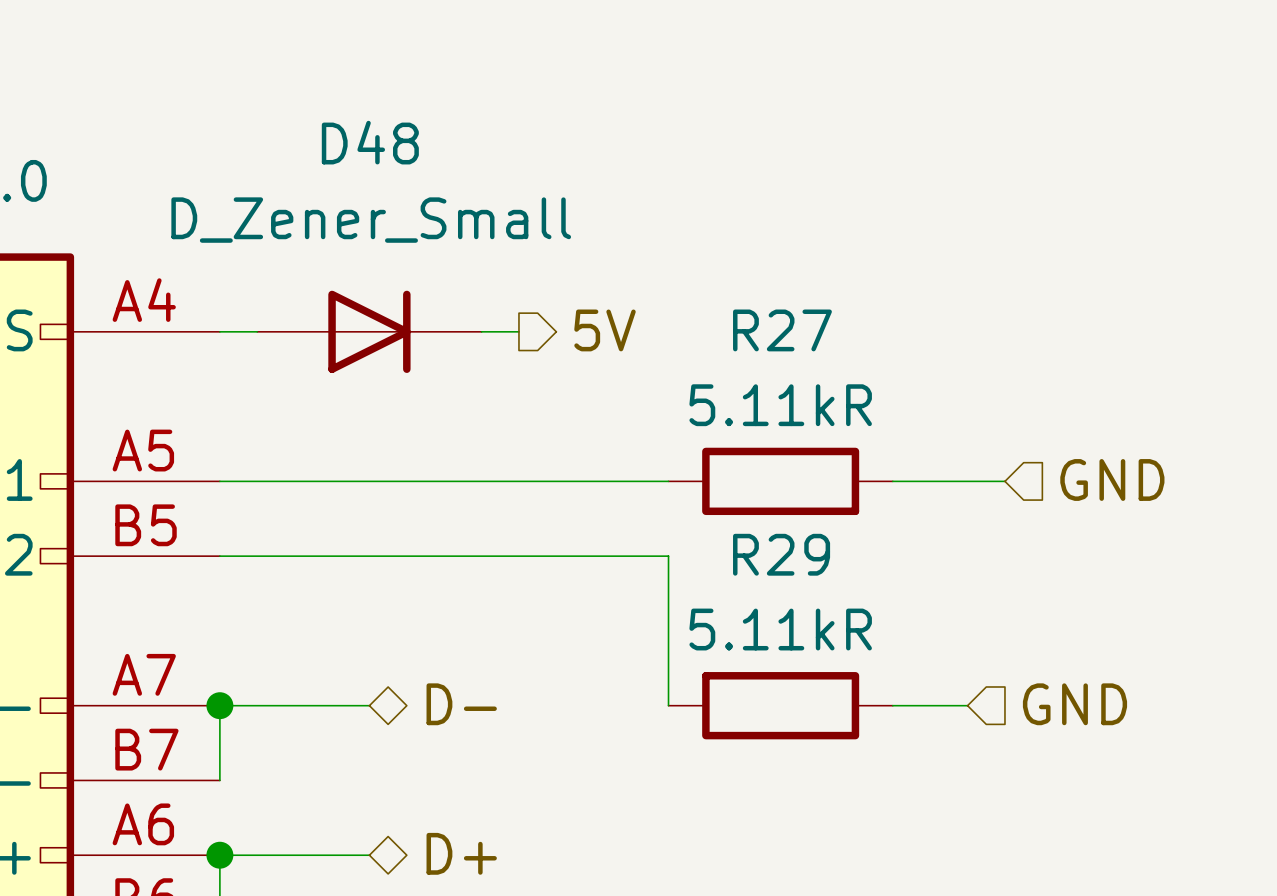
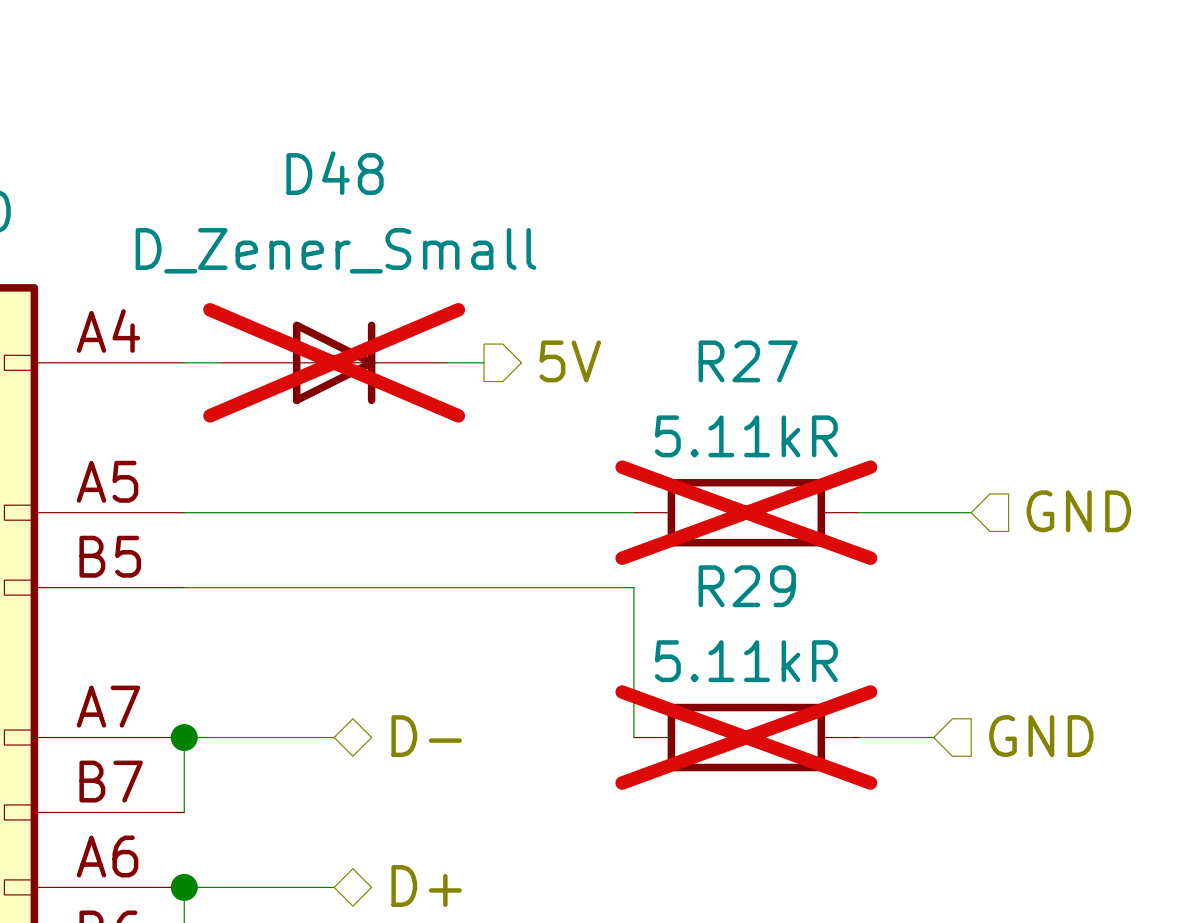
D48 do-not-place cross: none -> (334, 362)
R27 do-not-place cross: none -> (746, 512)
R29 do-not-place cross: none -> (746, 737)

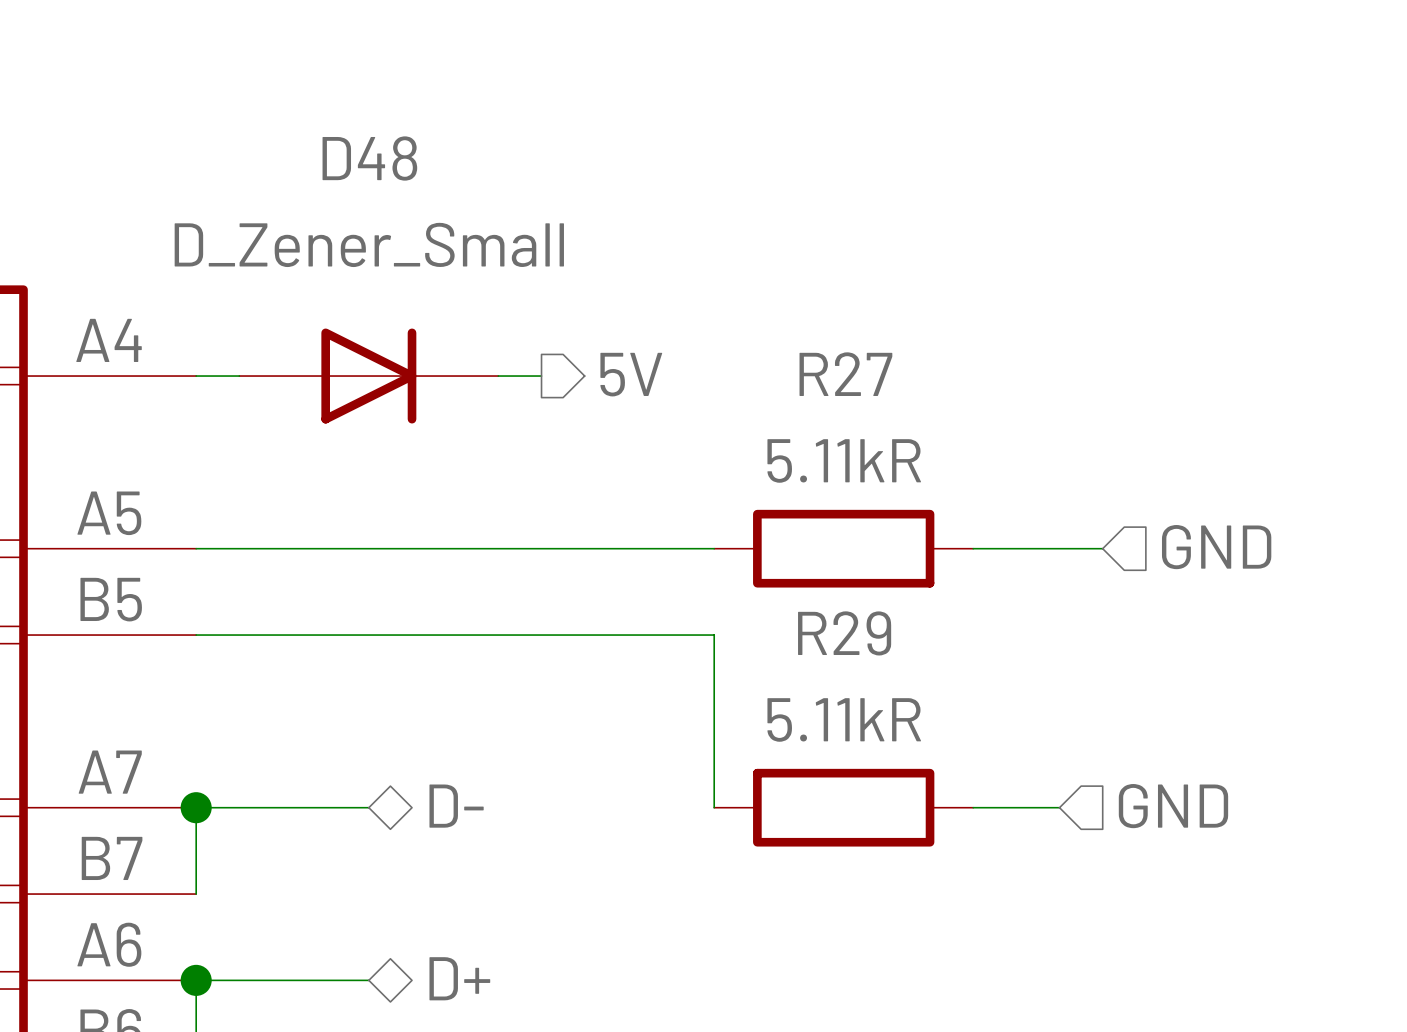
D48 do-not-place cross: (334, 362) -> none
R27 do-not-place cross: (746, 512) -> none
R29 do-not-place cross: (746, 737) -> none

